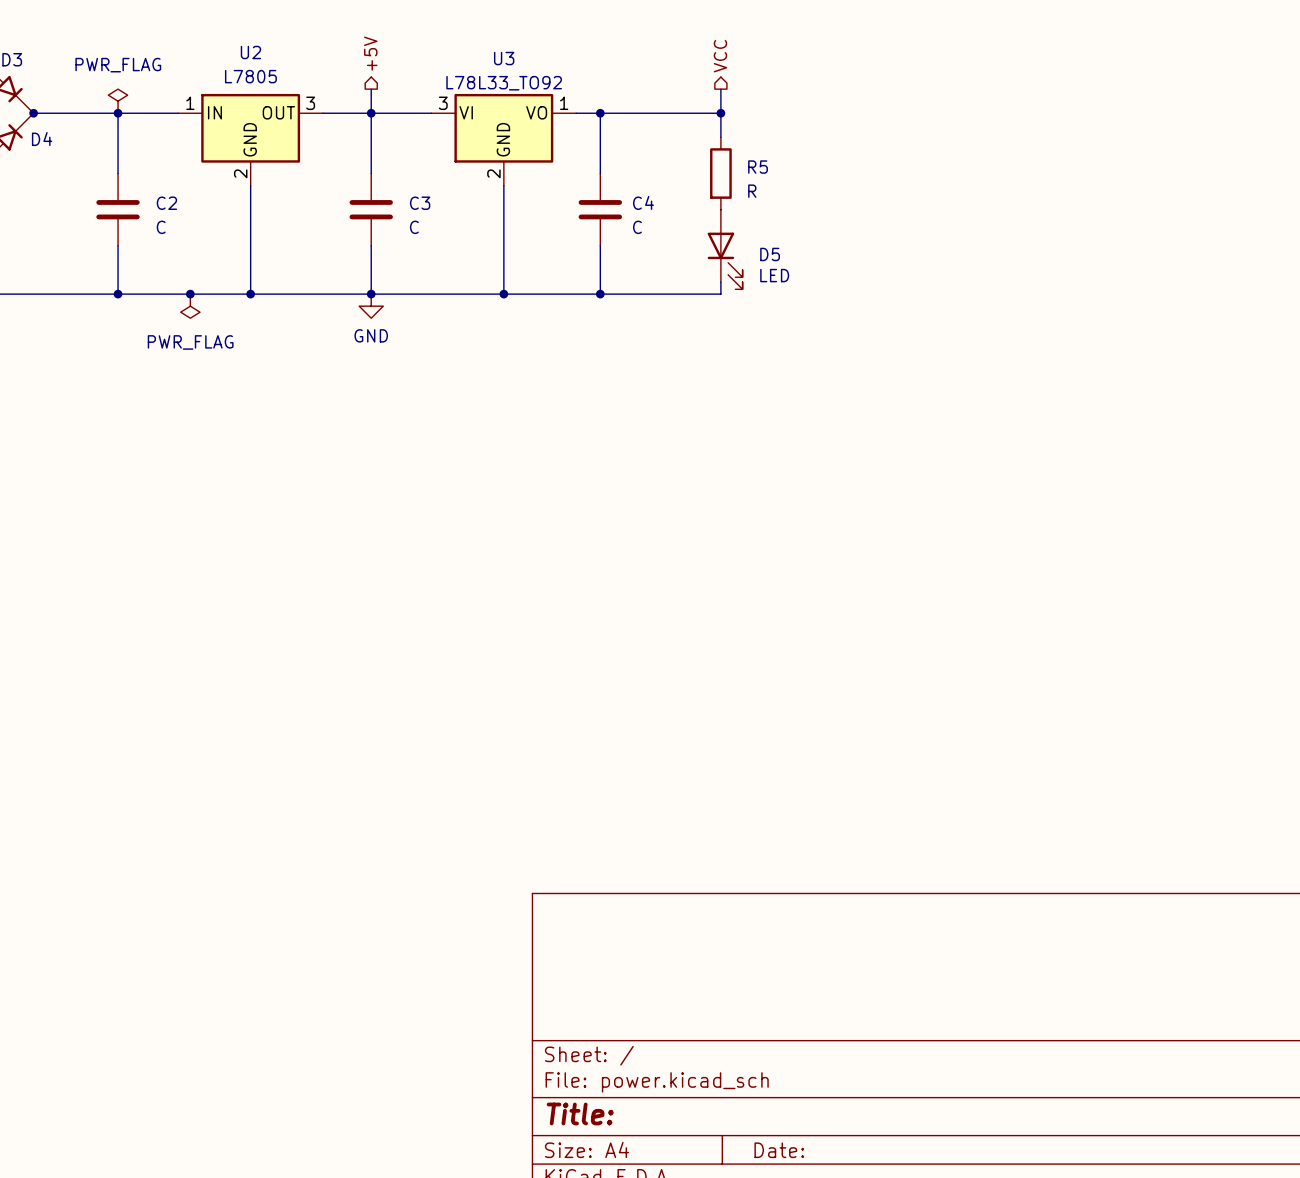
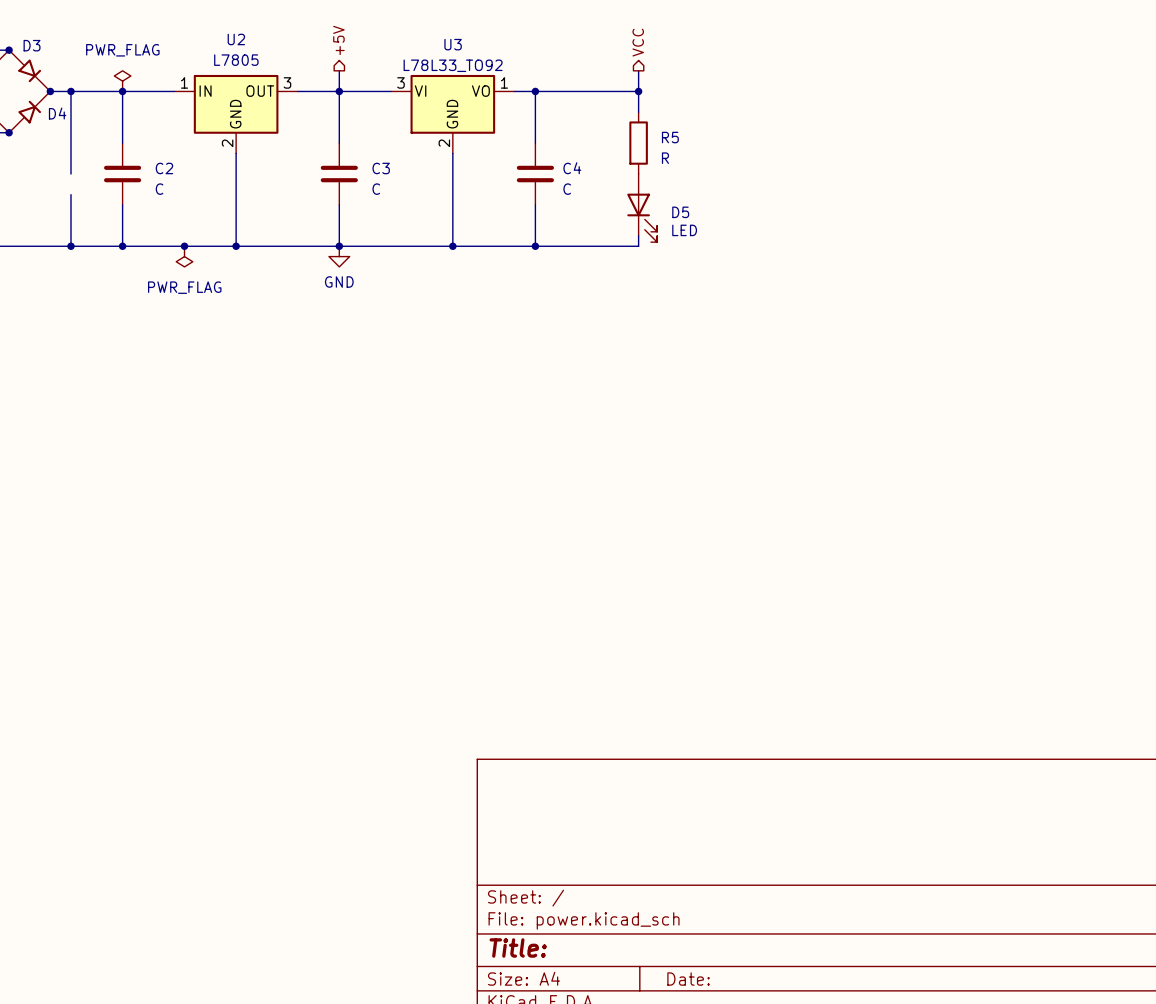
wire: none -> (70, 91) (70, 174)
junction: none -> (70, 91)
wire: none -> (70, 194) (70, 246)
junction: none -> (70, 246)

